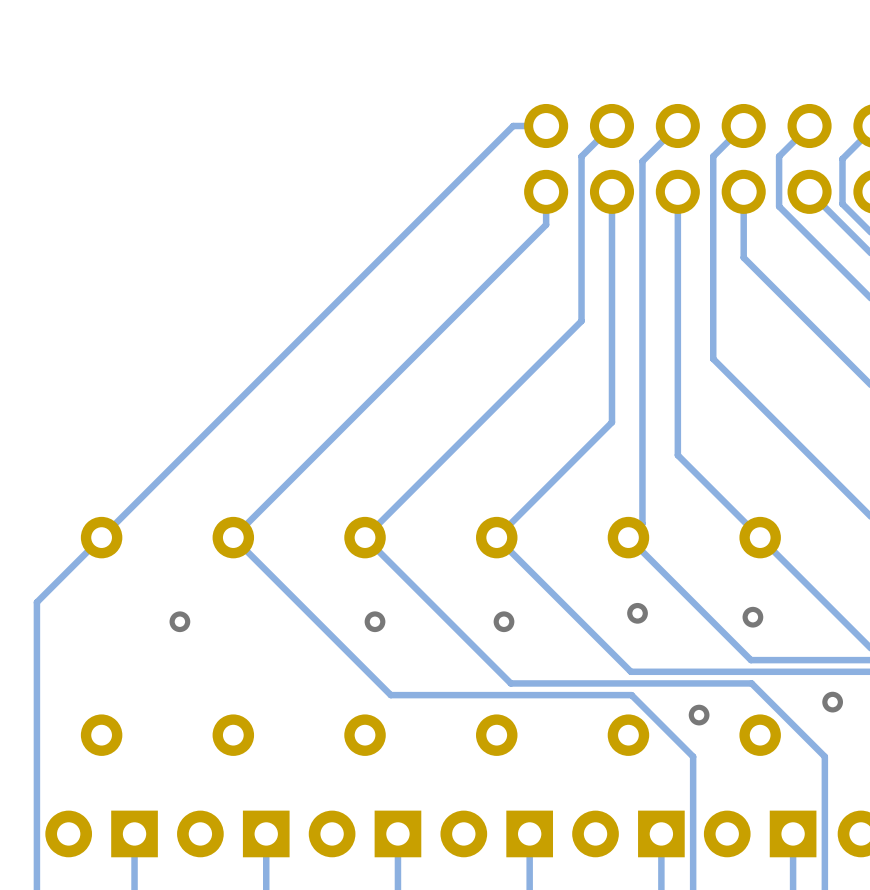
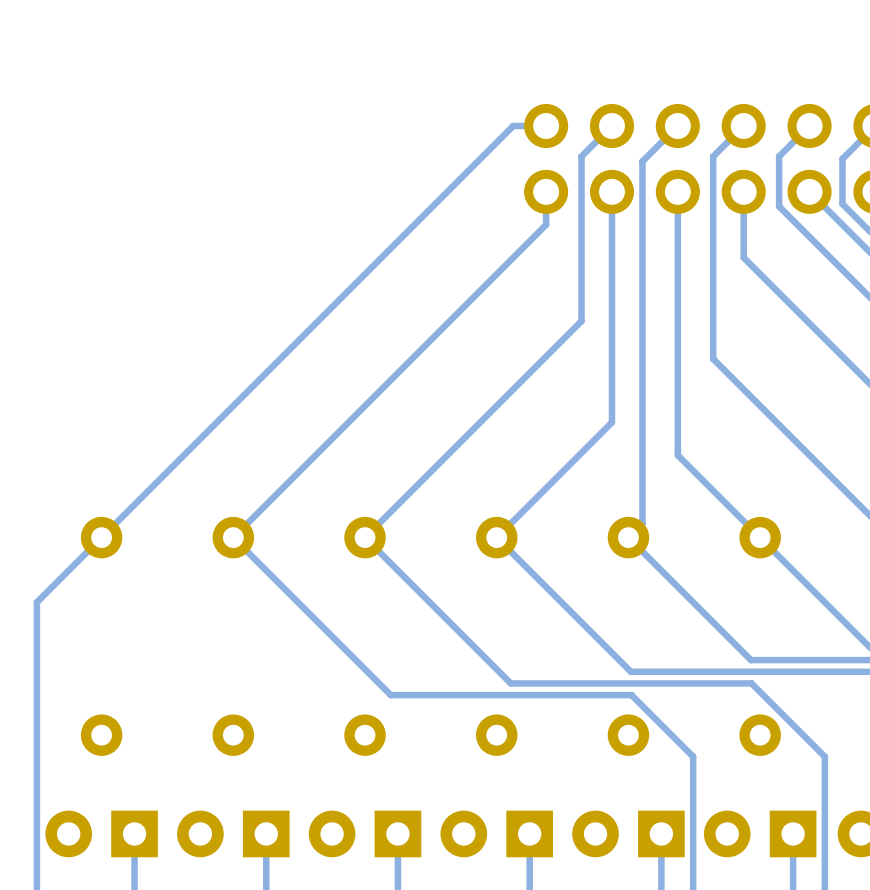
via: (637, 613) -> none
via: (752, 617) -> none
via: (179, 621) -> none
via: (375, 621) -> none
via: (504, 621) -> none
via: (832, 702) -> none
via: (699, 715) -> none

